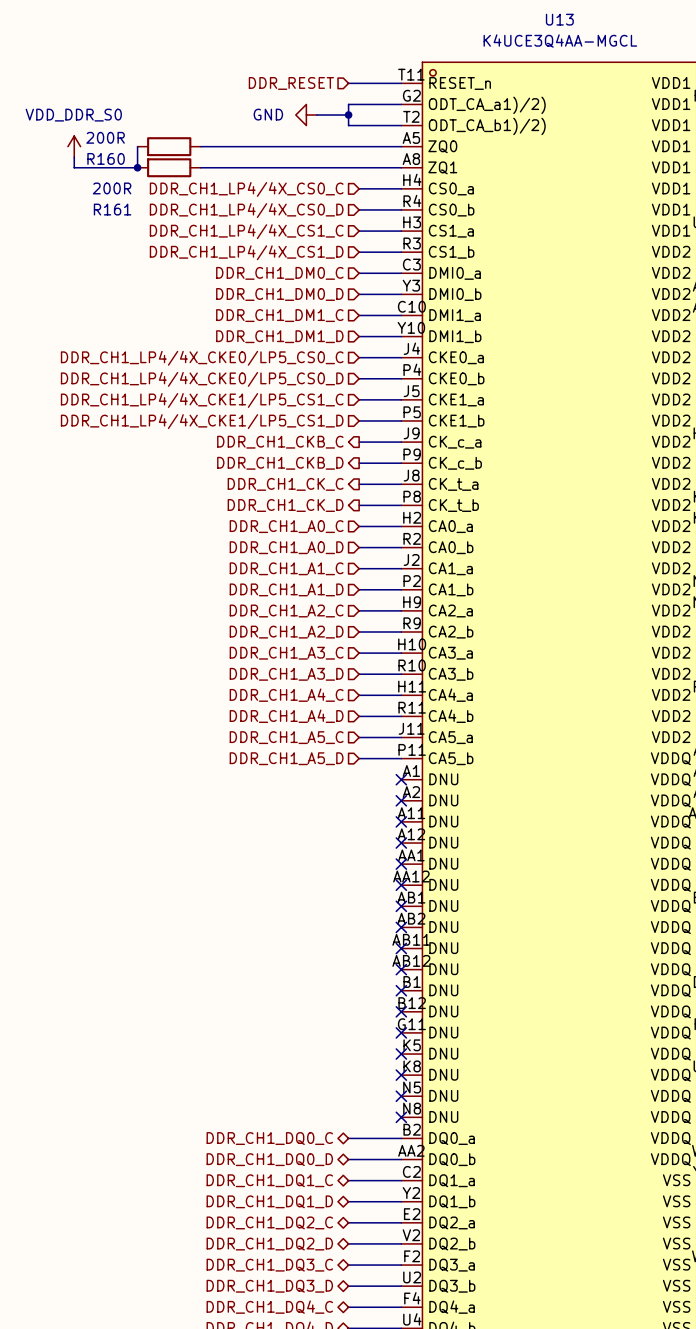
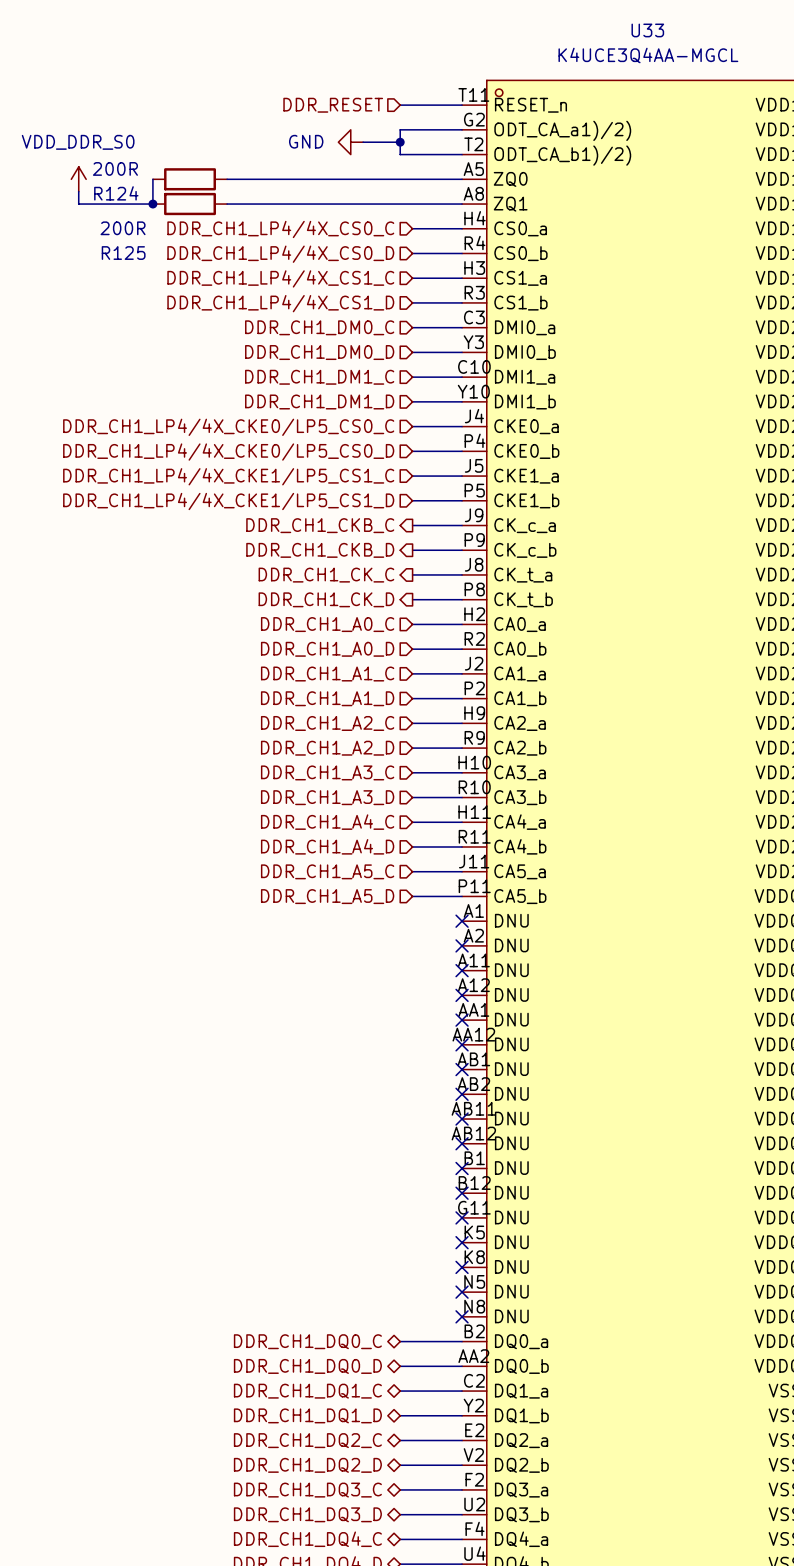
U13 name: U13 (559, 19) -> U33 (647, 30)
R160 name: R160 (106, 158) -> R124 (116, 193)
R161 name: R161 (112, 209) -> R125 (123, 253)

